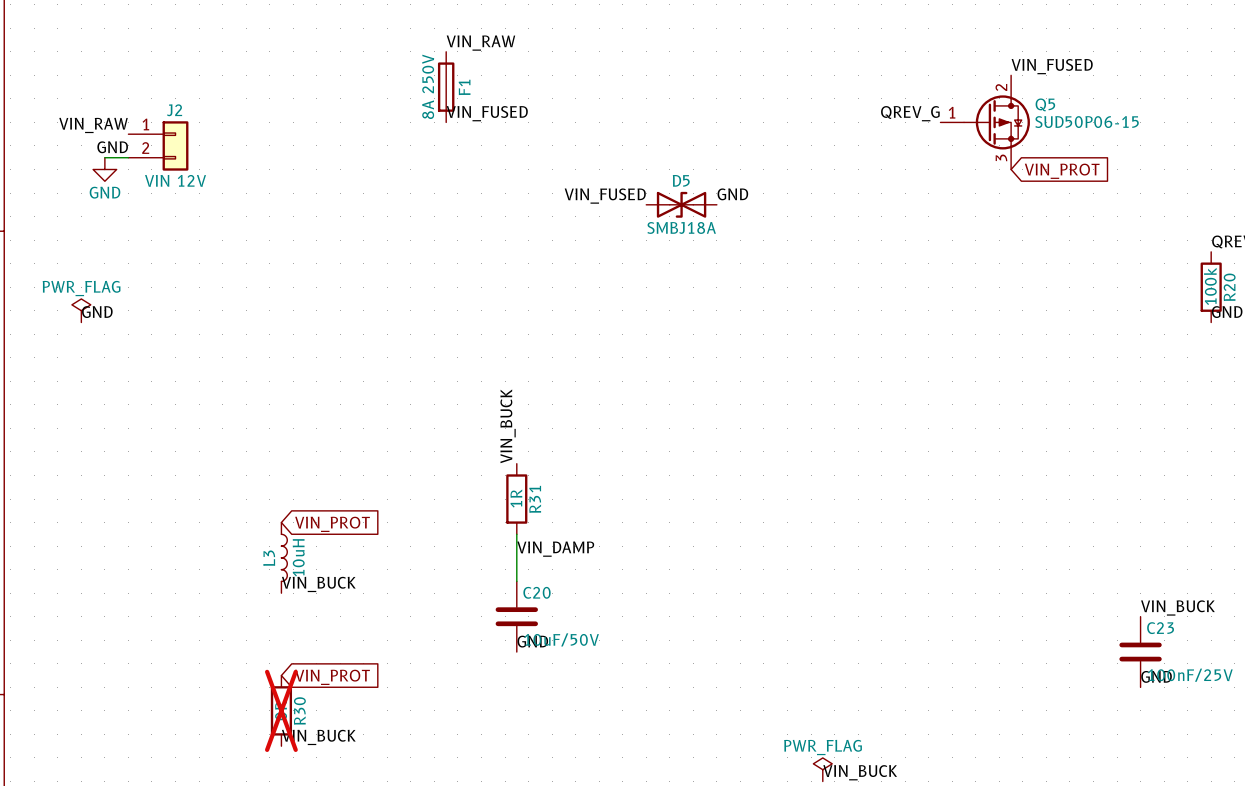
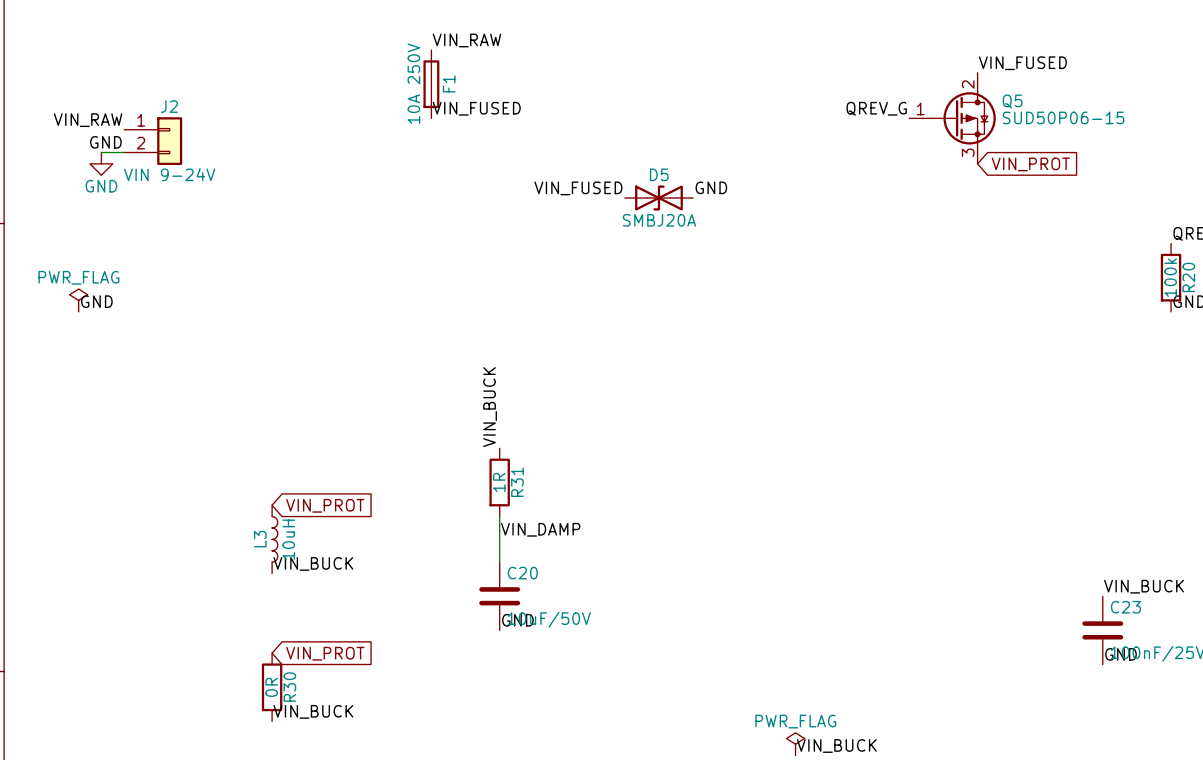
F1 value: 8A 250V (428, 86) -> 10A 250V (413, 83)
J2 value: VIN 12V (175, 180) -> VIN 9-24V (169, 174)
D5 value: SMBJ18A (681, 227) -> SMBJ20A (659, 220)
R30 do-not-place cross: (281, 710) -> none

